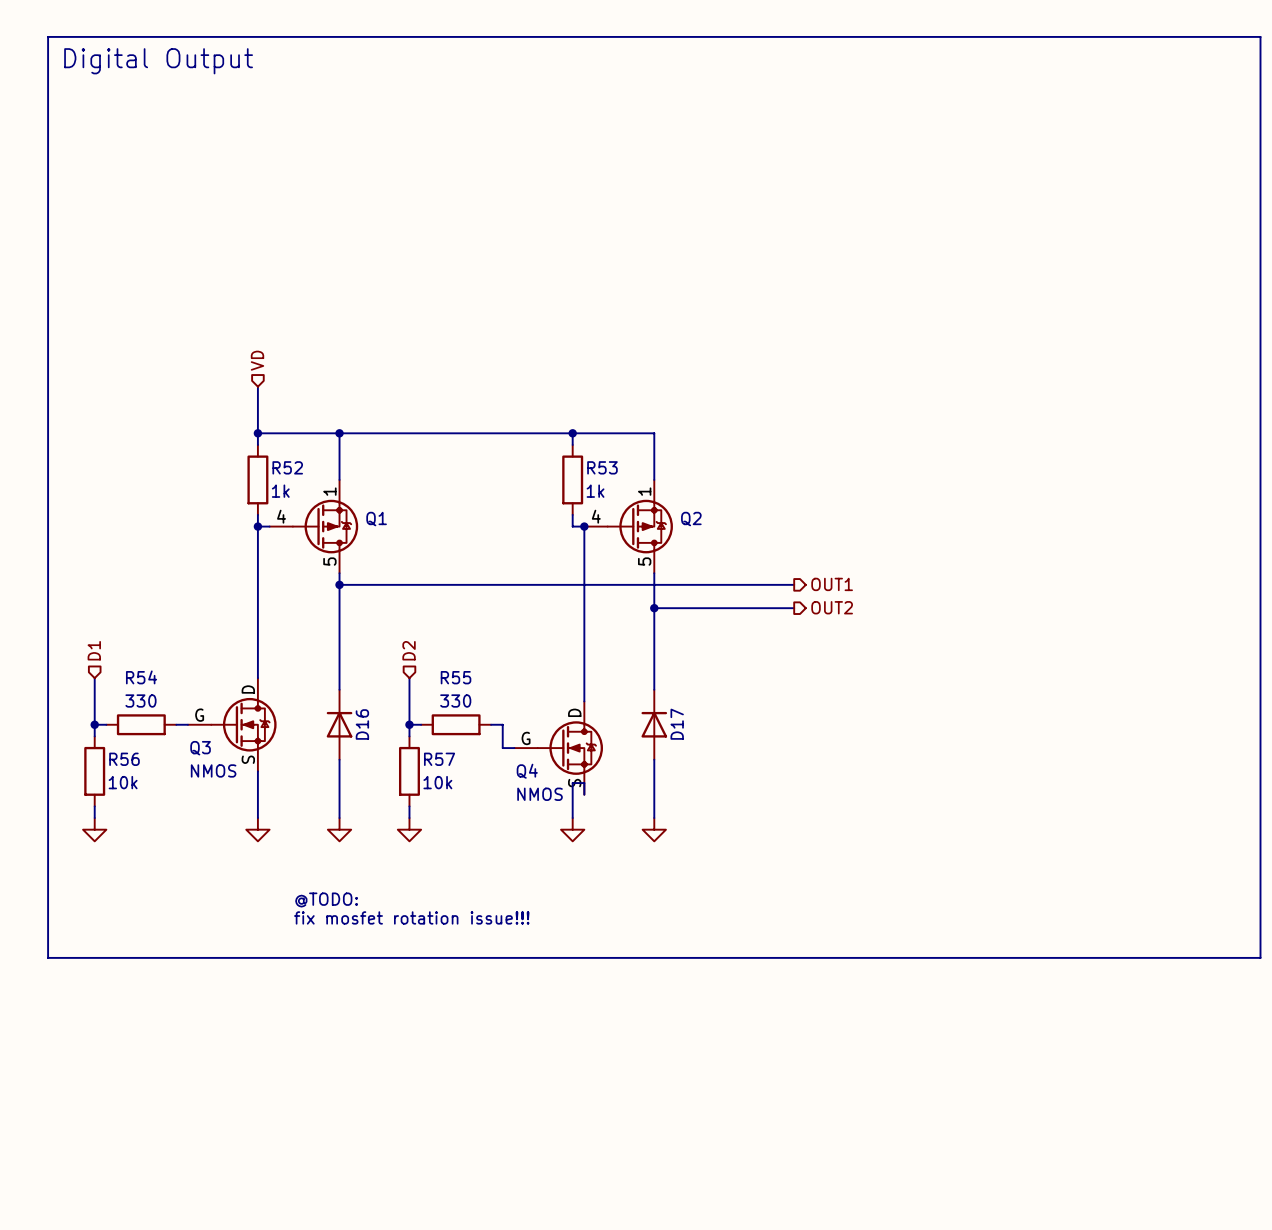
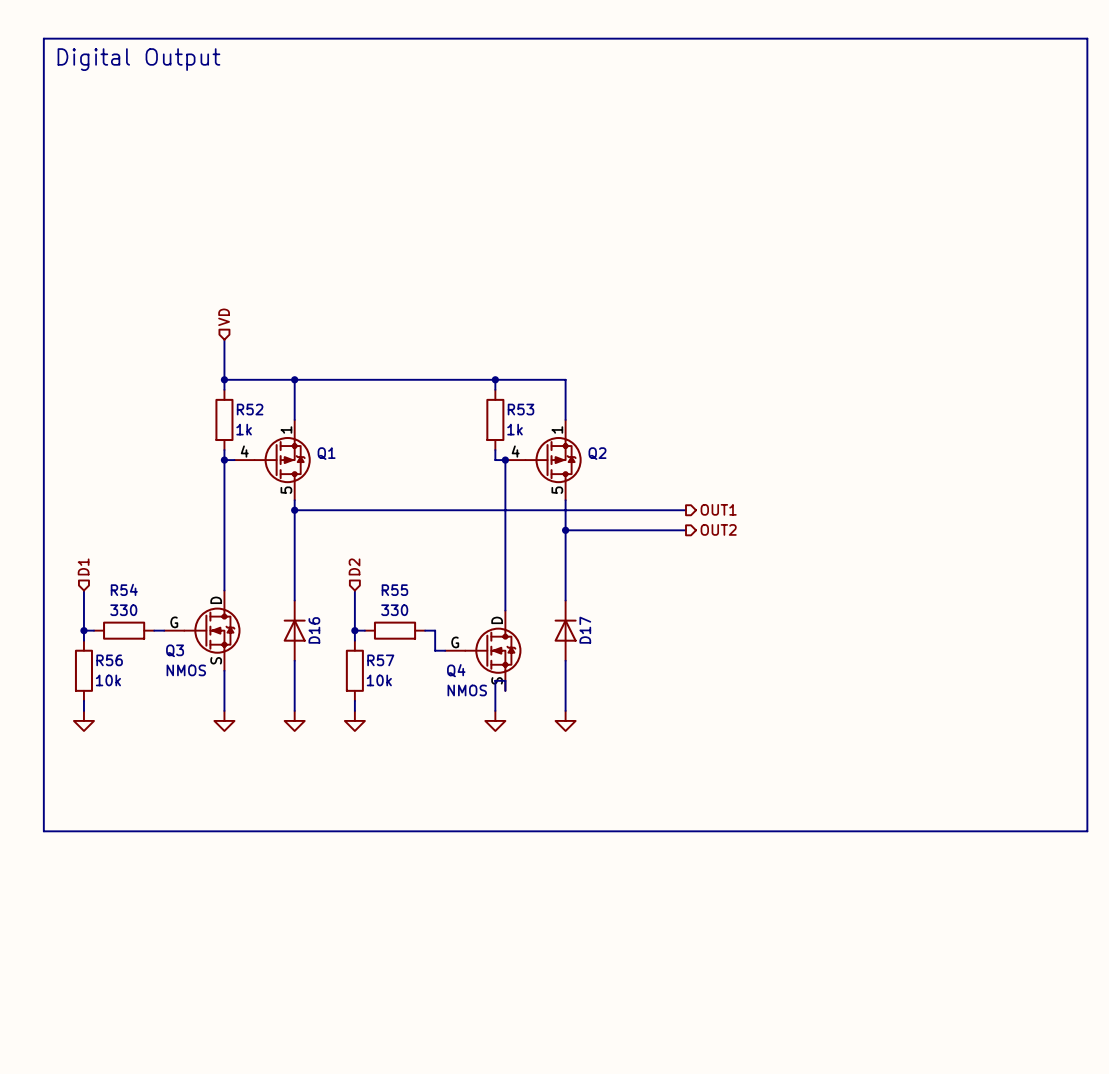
text: @TODO: (326, 900) -> none
text: fix mosfet rotation issue!!! (411, 917) -> none

